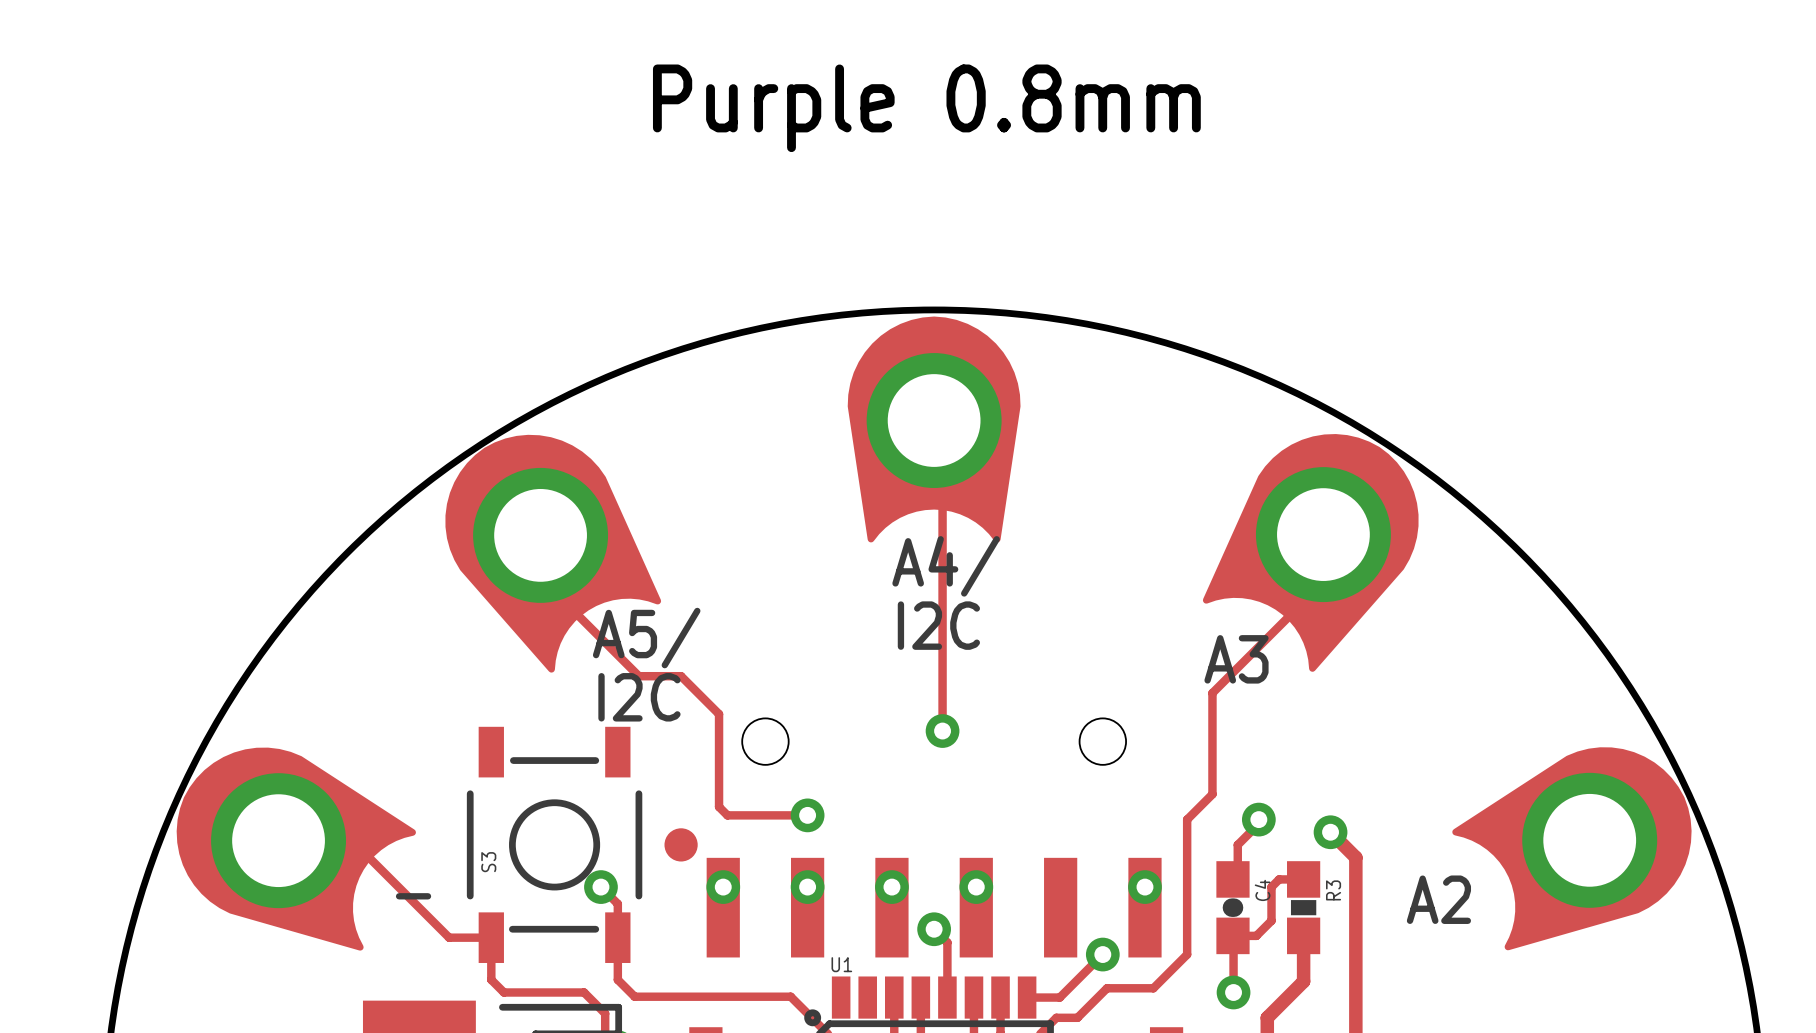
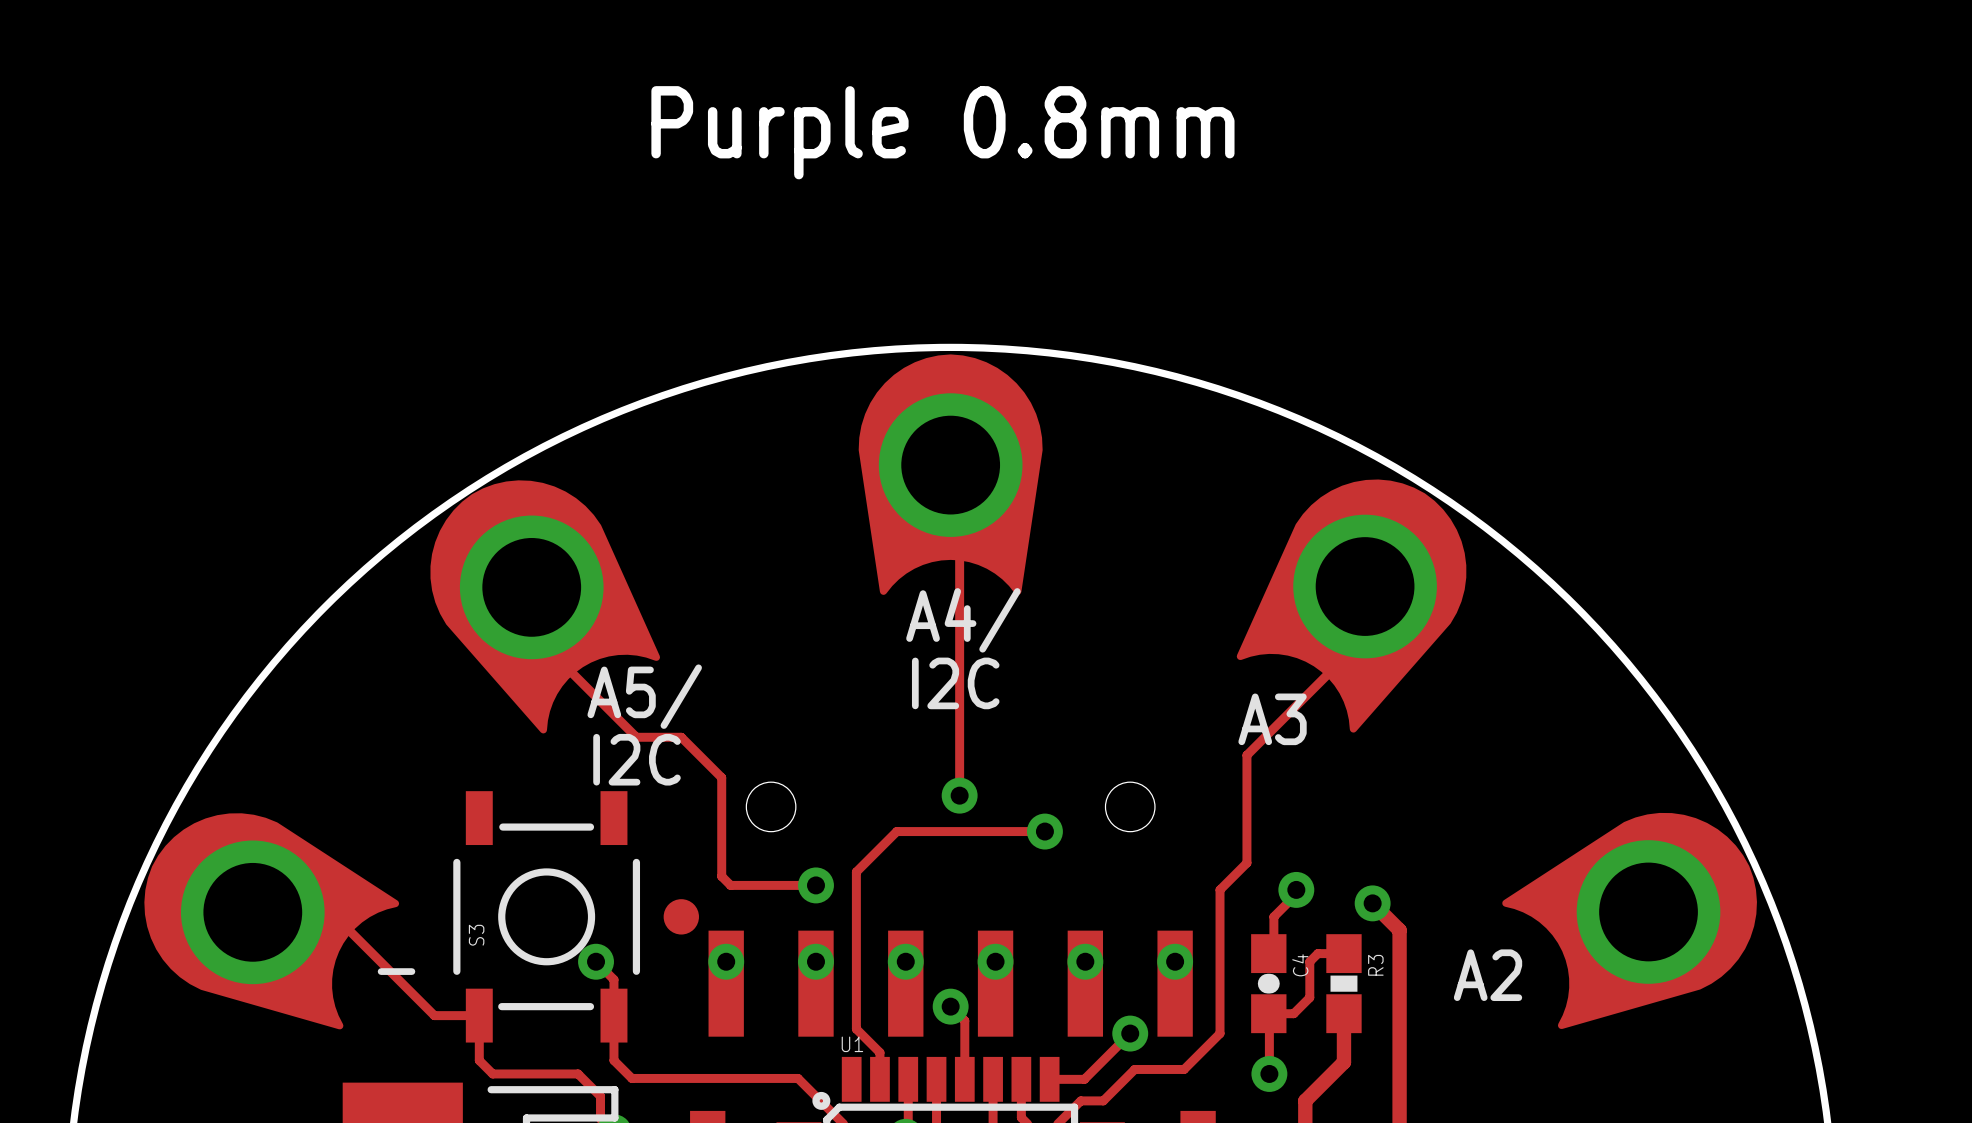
track: none -> (1044, 831) (896, 831) (856, 871) (856, 1029) (879, 1052) (879, 1079)
via: none -> (1044, 831)
via: none -> (1085, 961)

